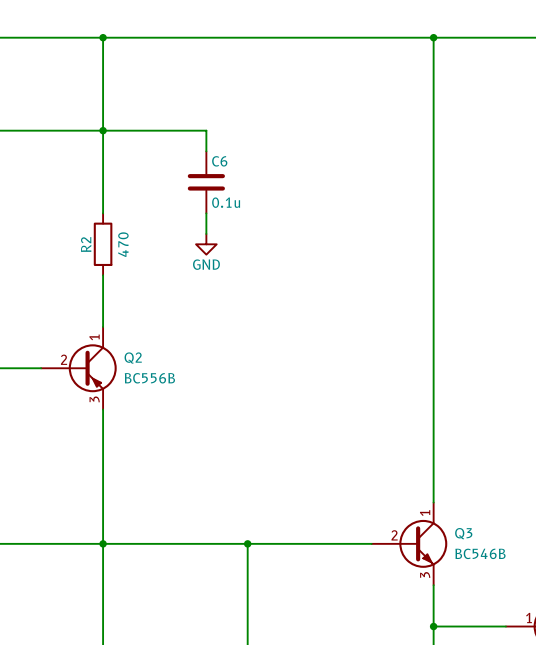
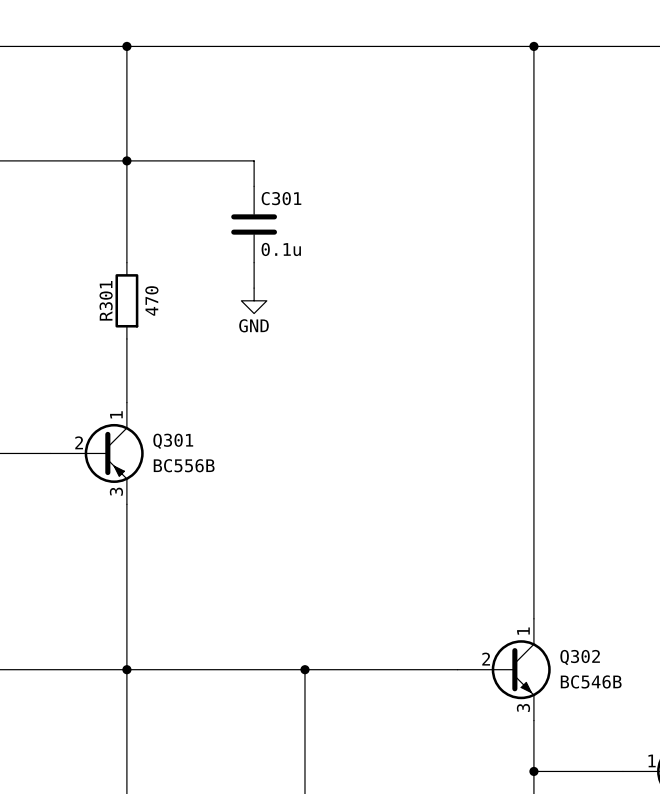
C6 name: C6 (219, 161) -> C301 (281, 198)
R2 name: R2 (86, 244) -> R301 (106, 300)
Q2 name: Q2 (133, 358) -> Q301 (173, 441)
Q3 name: Q3 (463, 533) -> Q302 (580, 657)

